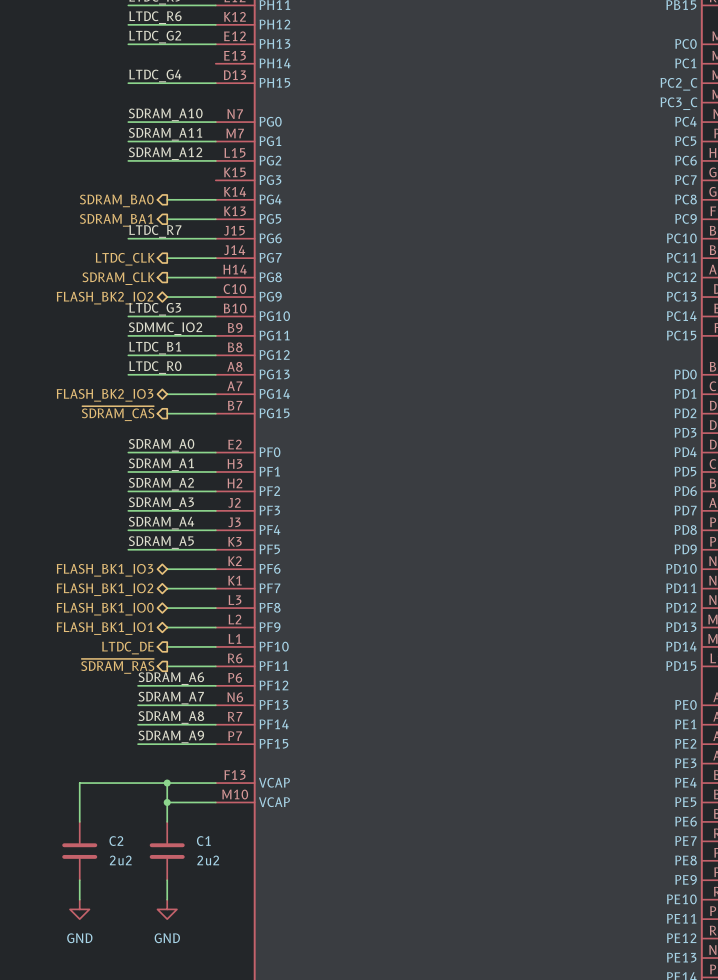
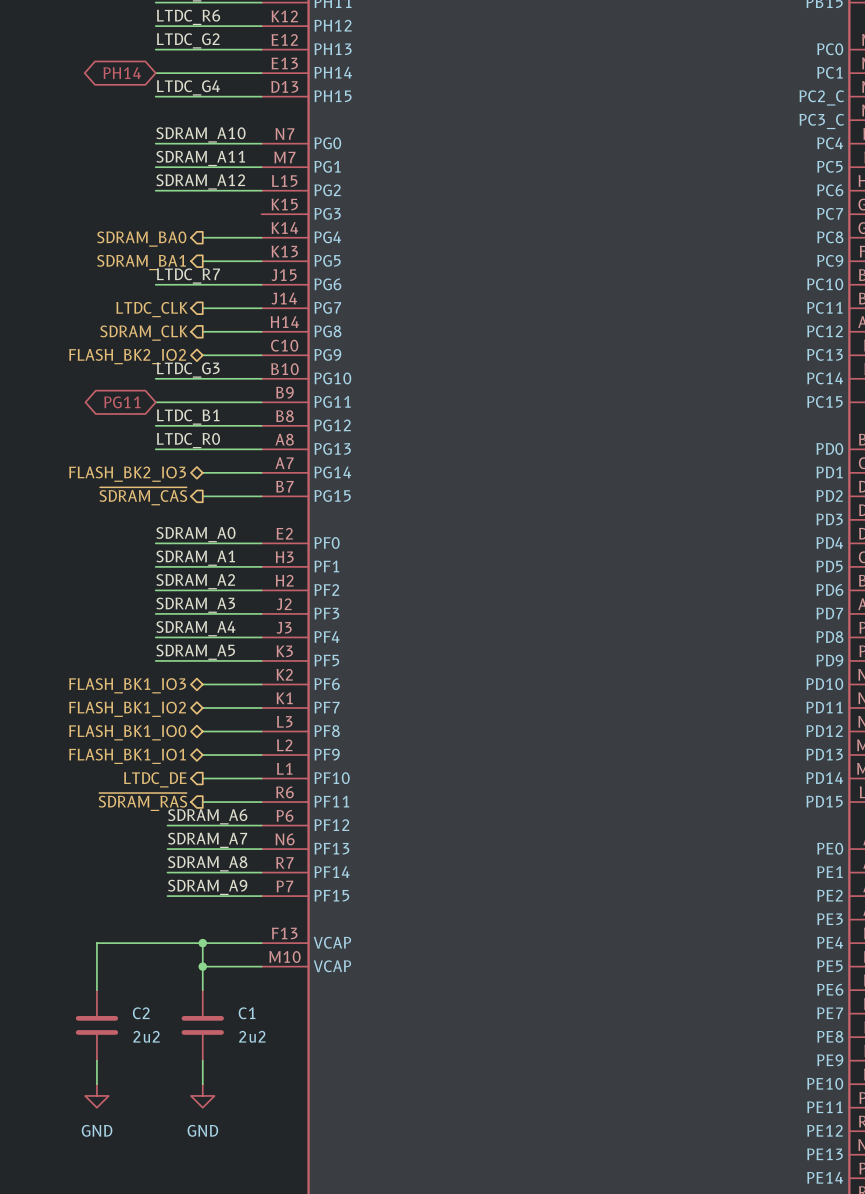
global label: none -> PH14 (122, 73)
wire: none -> (155, 73) (261, 73)
label: SDMMC_IO2 (165, 328) -> none
global label: none -> PG11 (122, 402)

